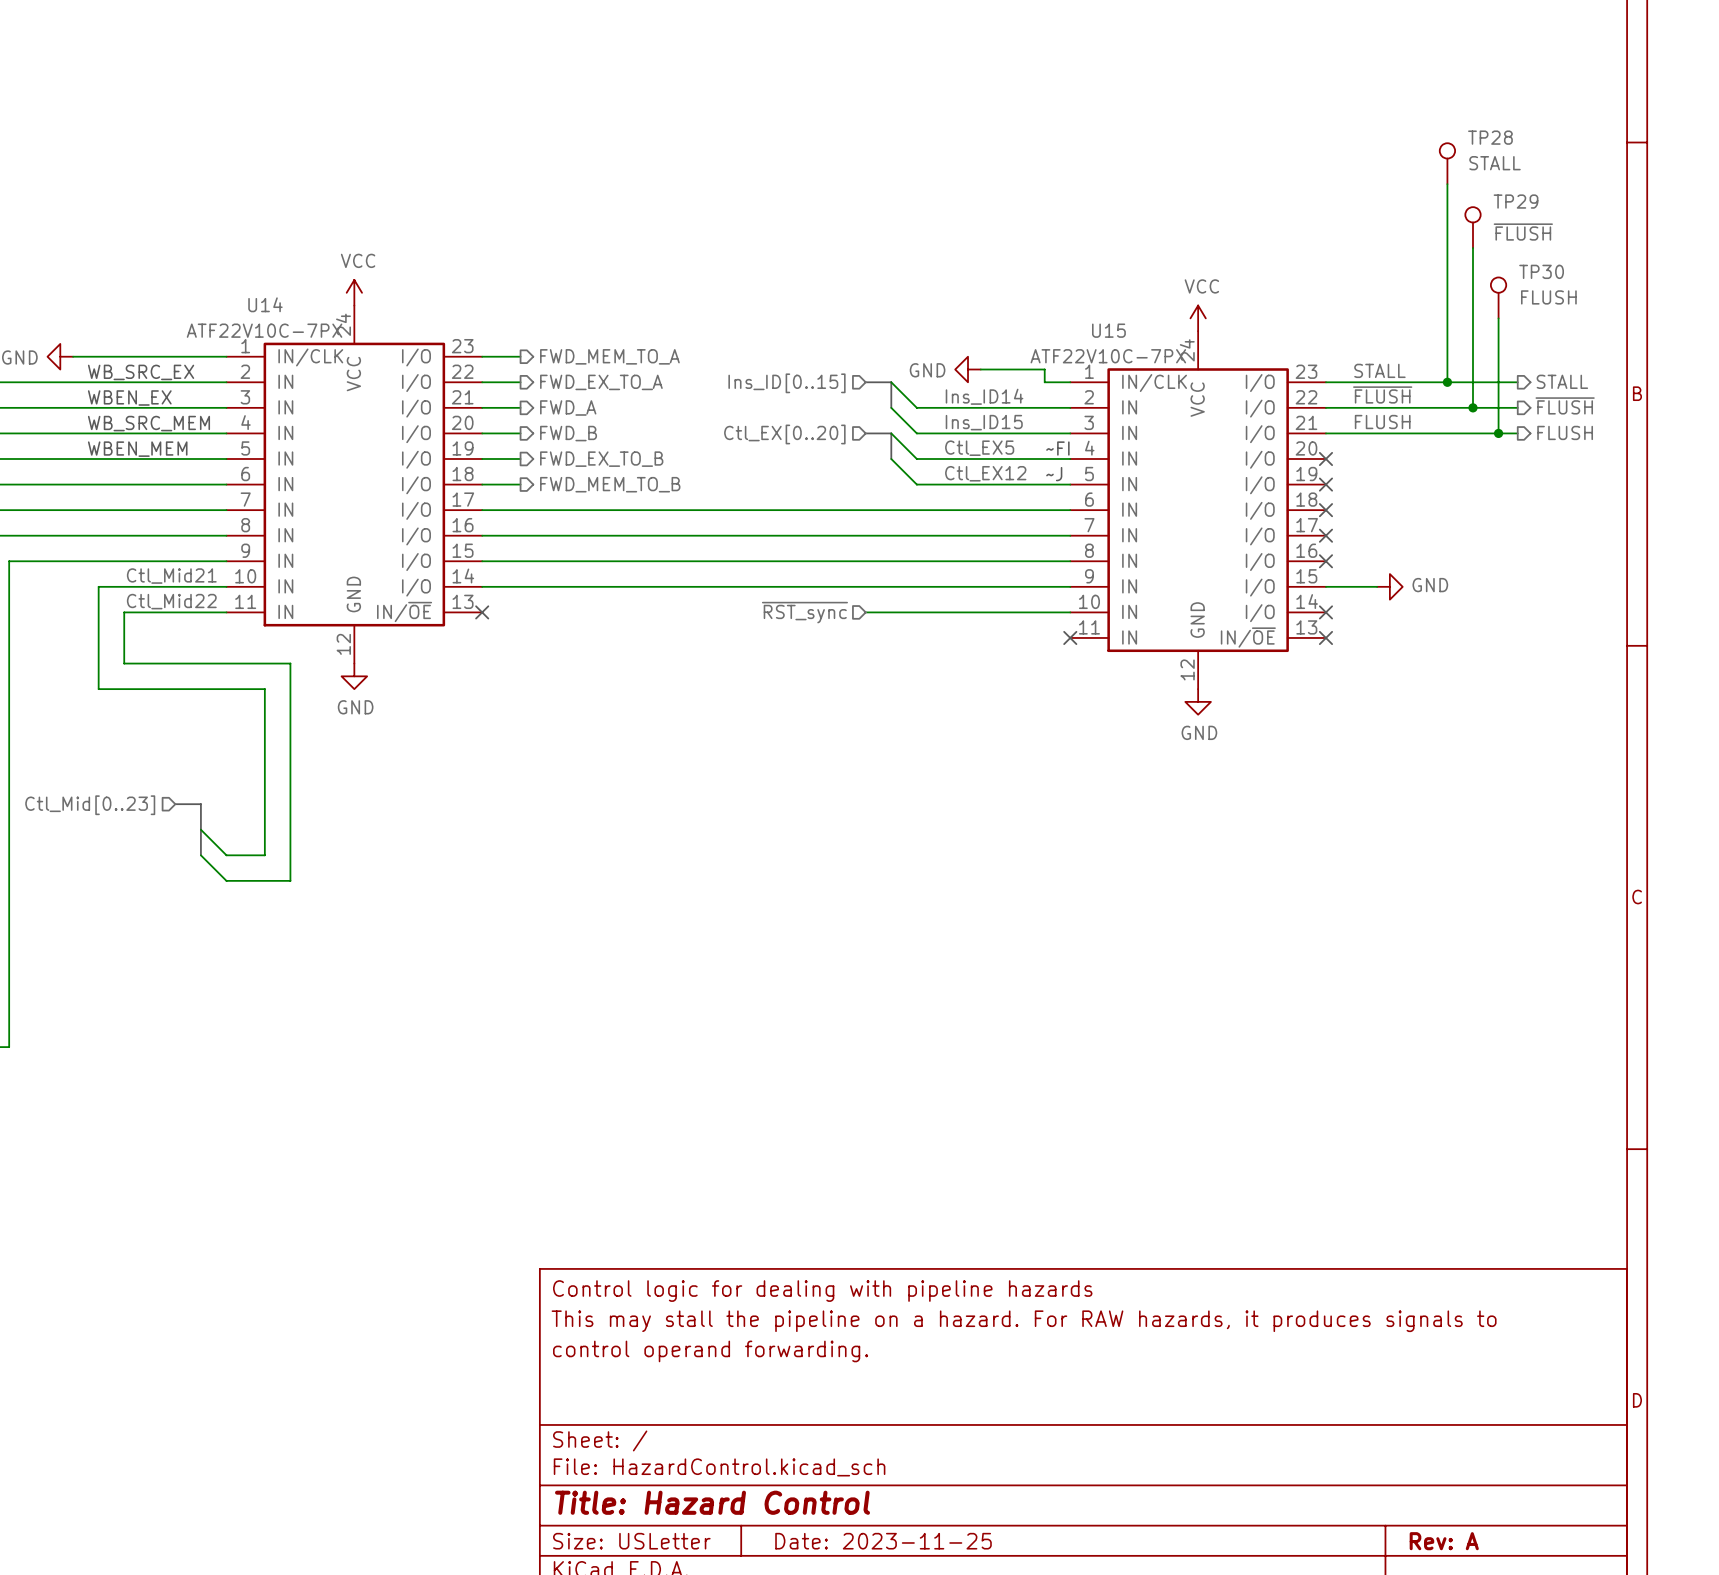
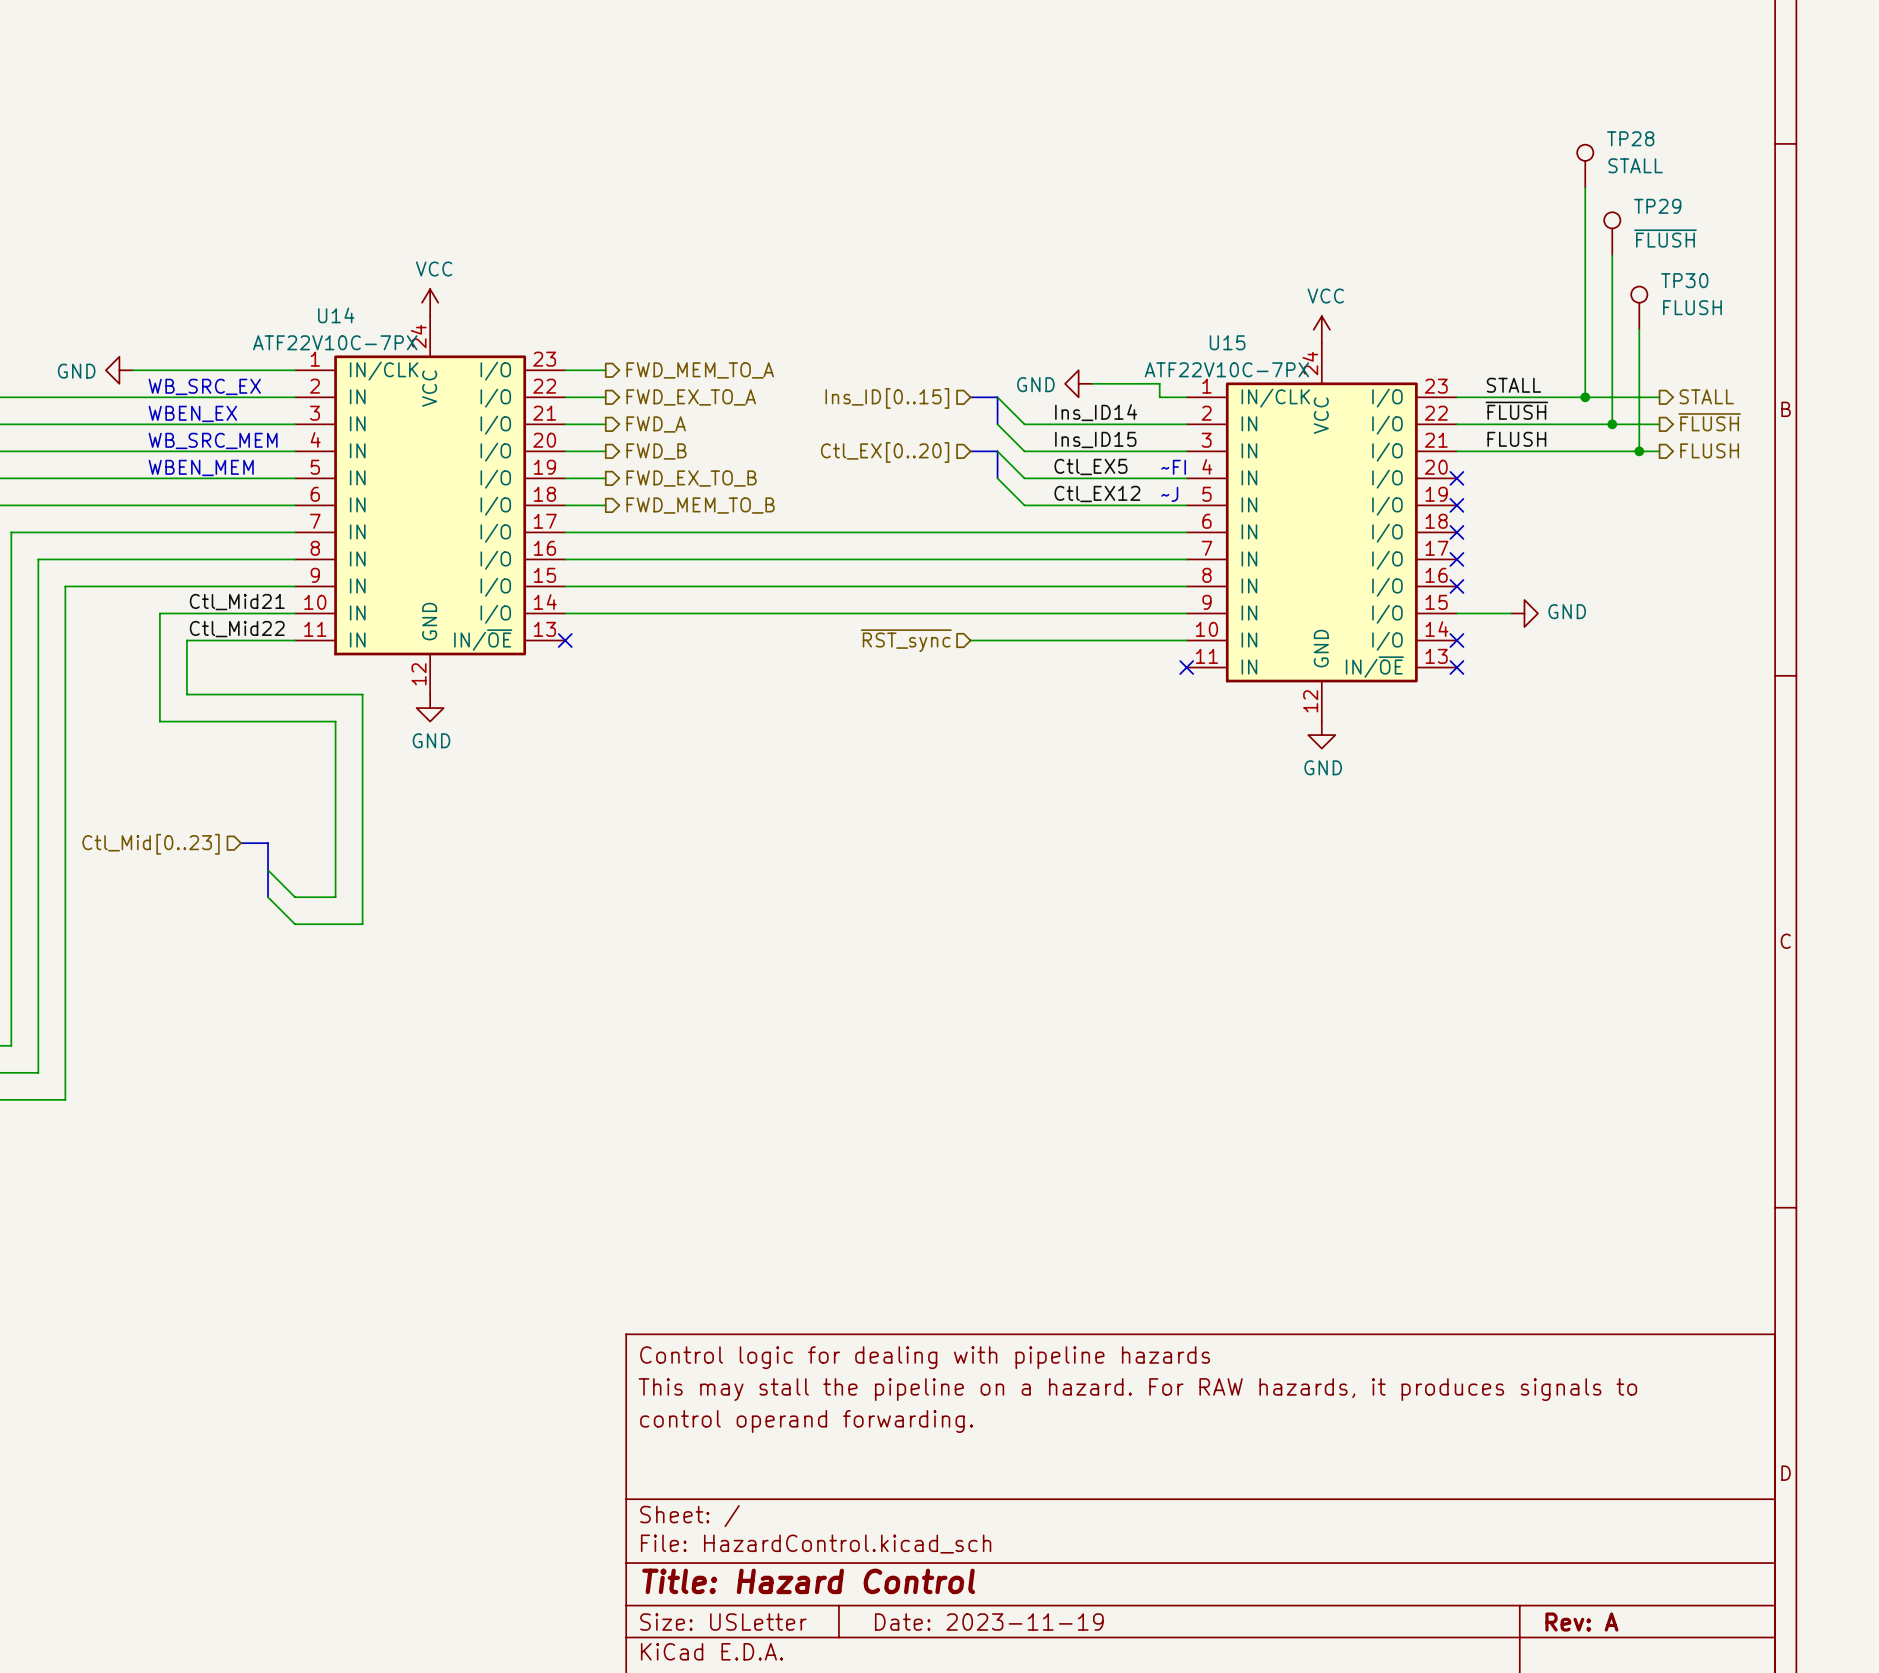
title block: Date: 2023-11-25 (883, 1541) -> Date: 2023-11-19 (989, 1622)

